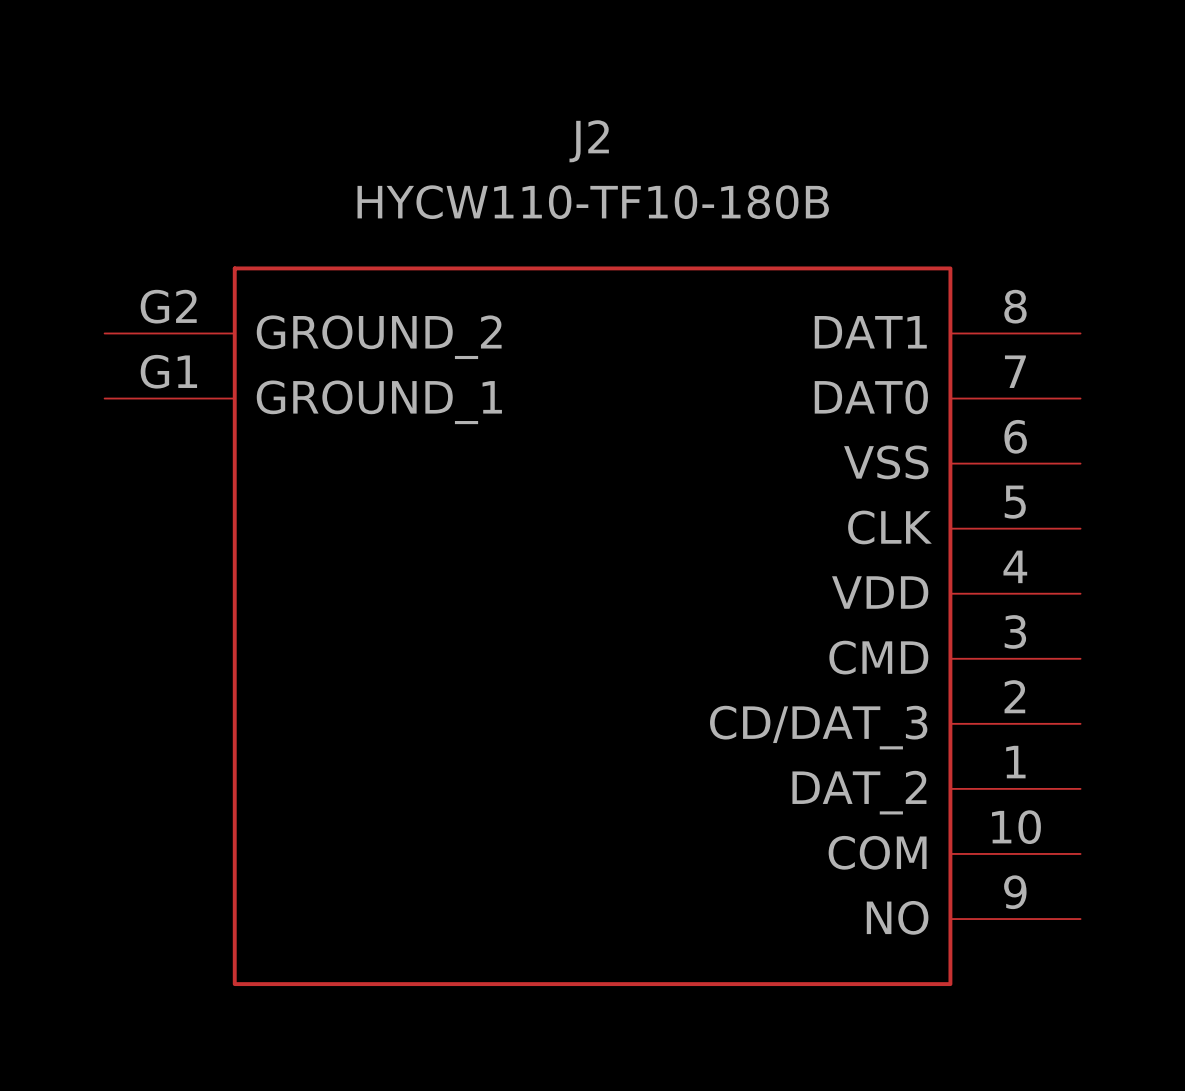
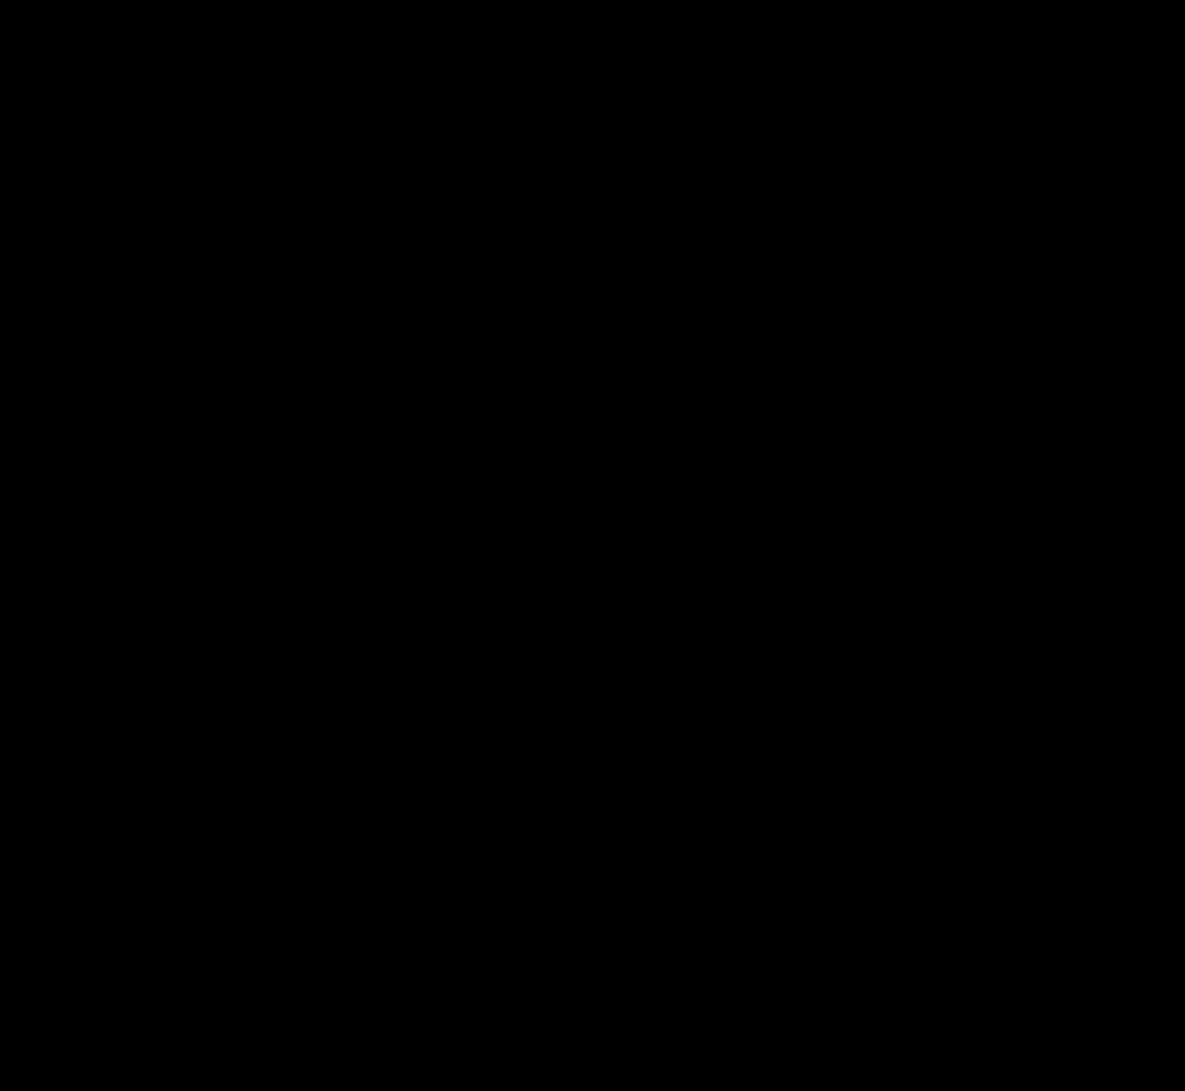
J2: HYCW110-TF10-180B (592, 626) -> none

